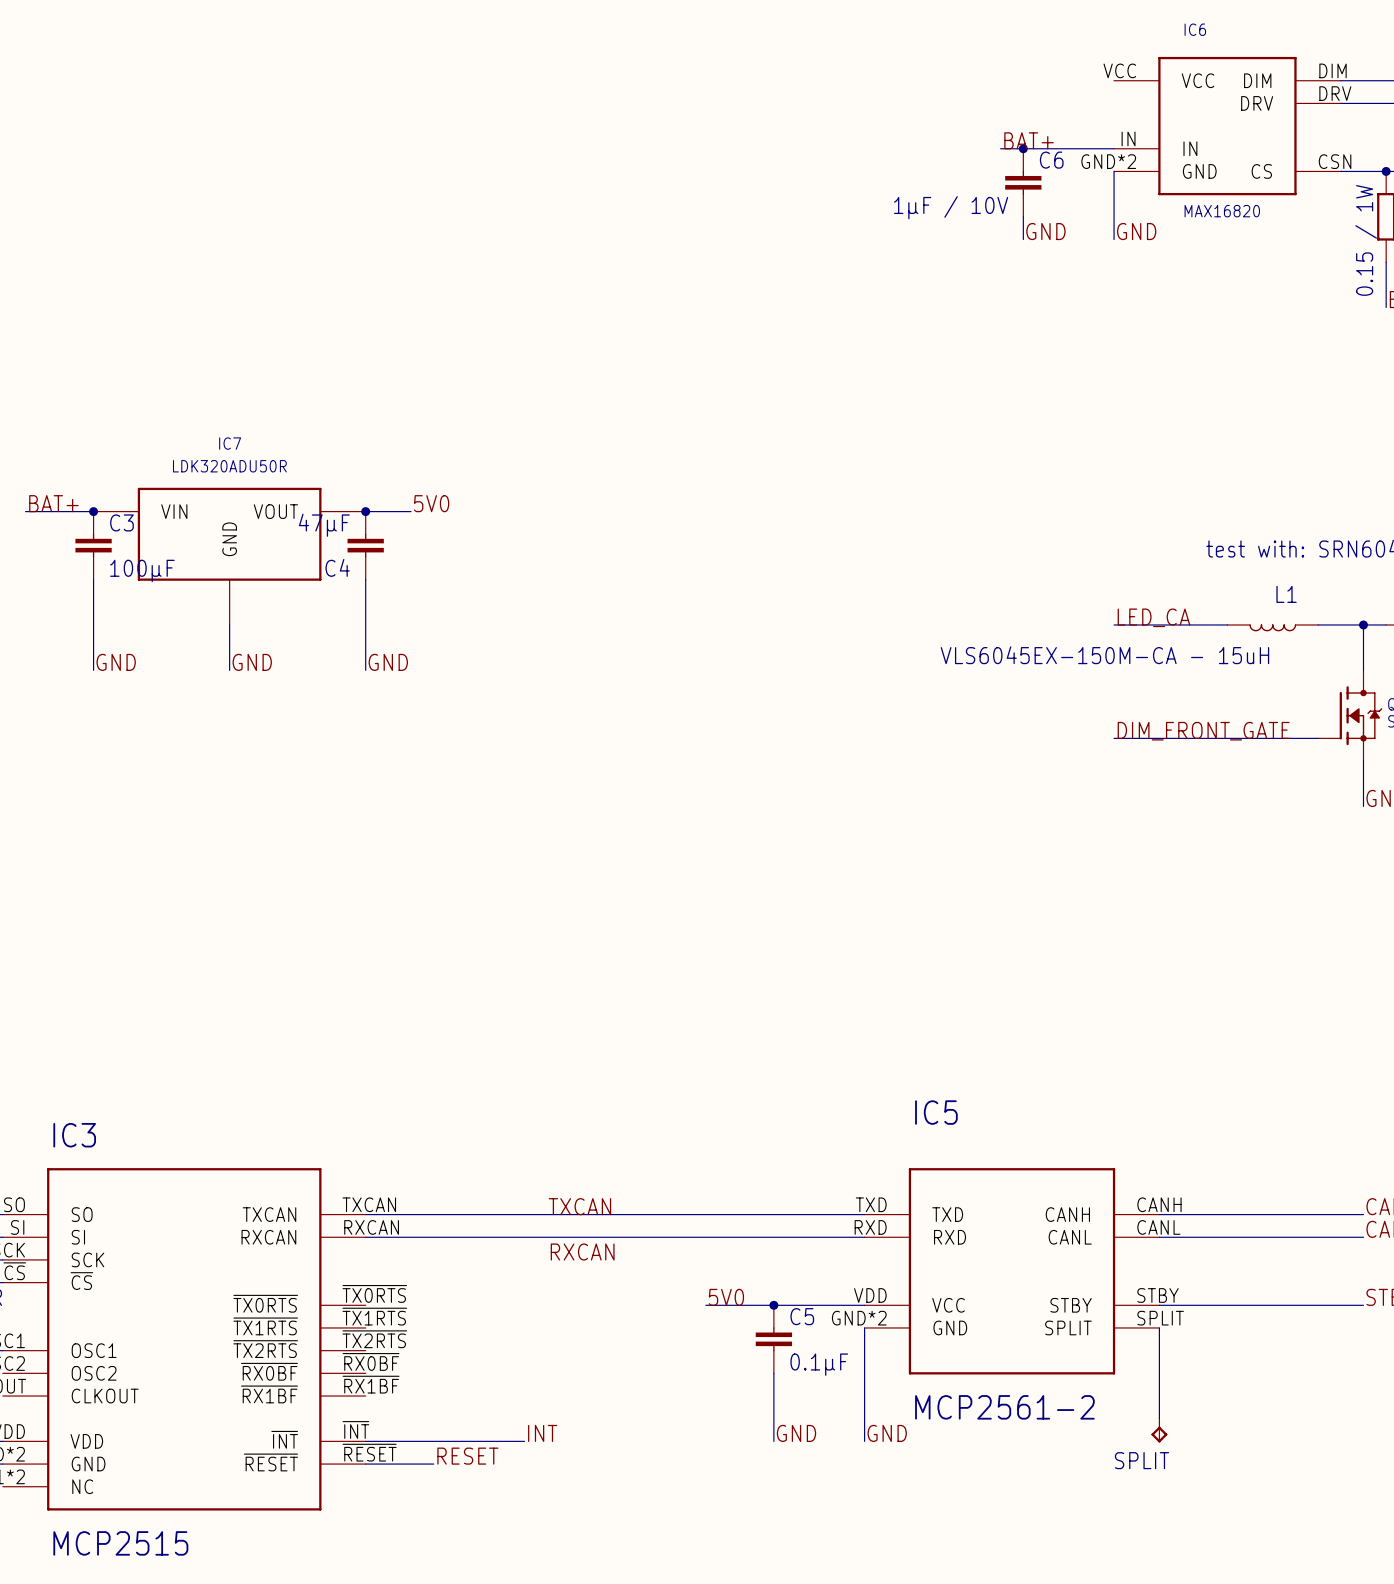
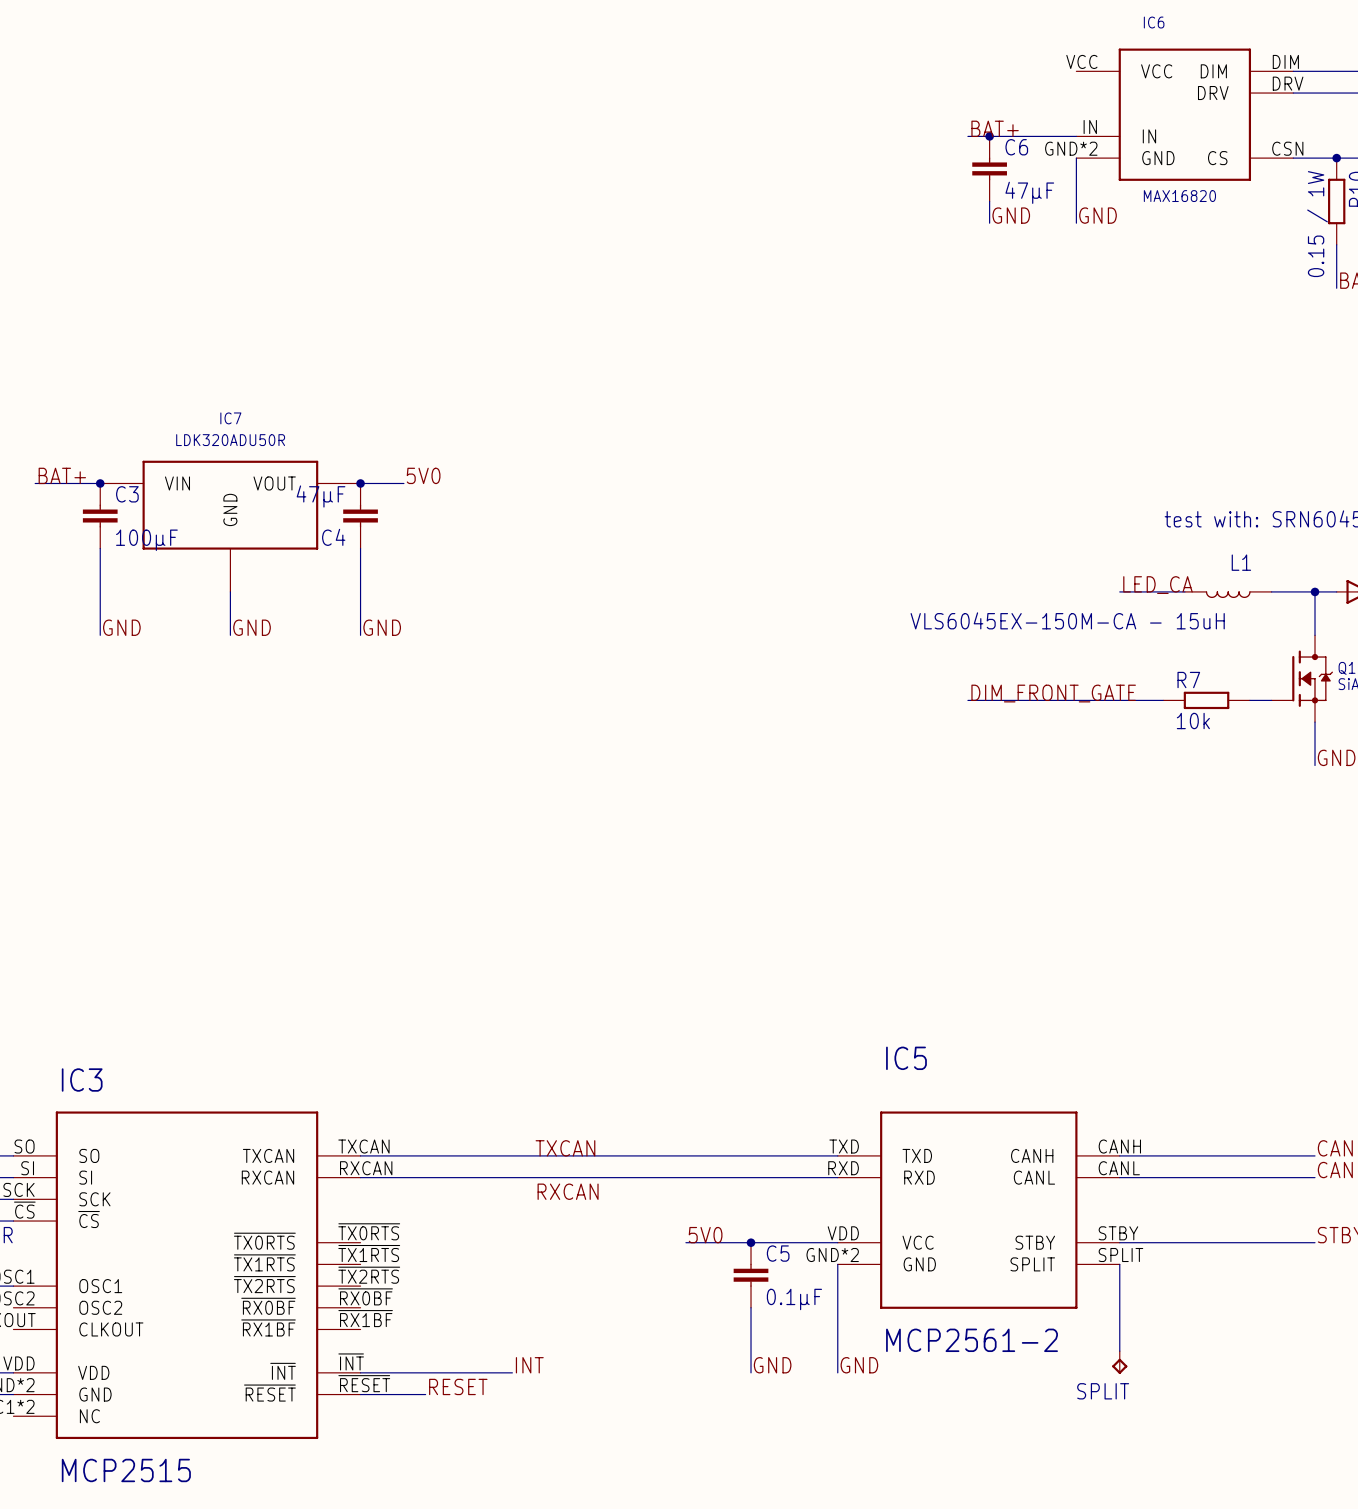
C6 value: 1μF / 10V (951, 207) -> 47μF (1029, 192)
label position: LED_CA (1153, 617) -> LED_CA (1157, 585)
wire: (1114, 624) (1159, 624) -> none
label position: DIM_FRONT_GATE (1203, 731) -> DIM_FRONT_GATE (1053, 693)
wire: none -> (967, 700) (1076, 700)
R7: none -> 10k (1206, 700)

